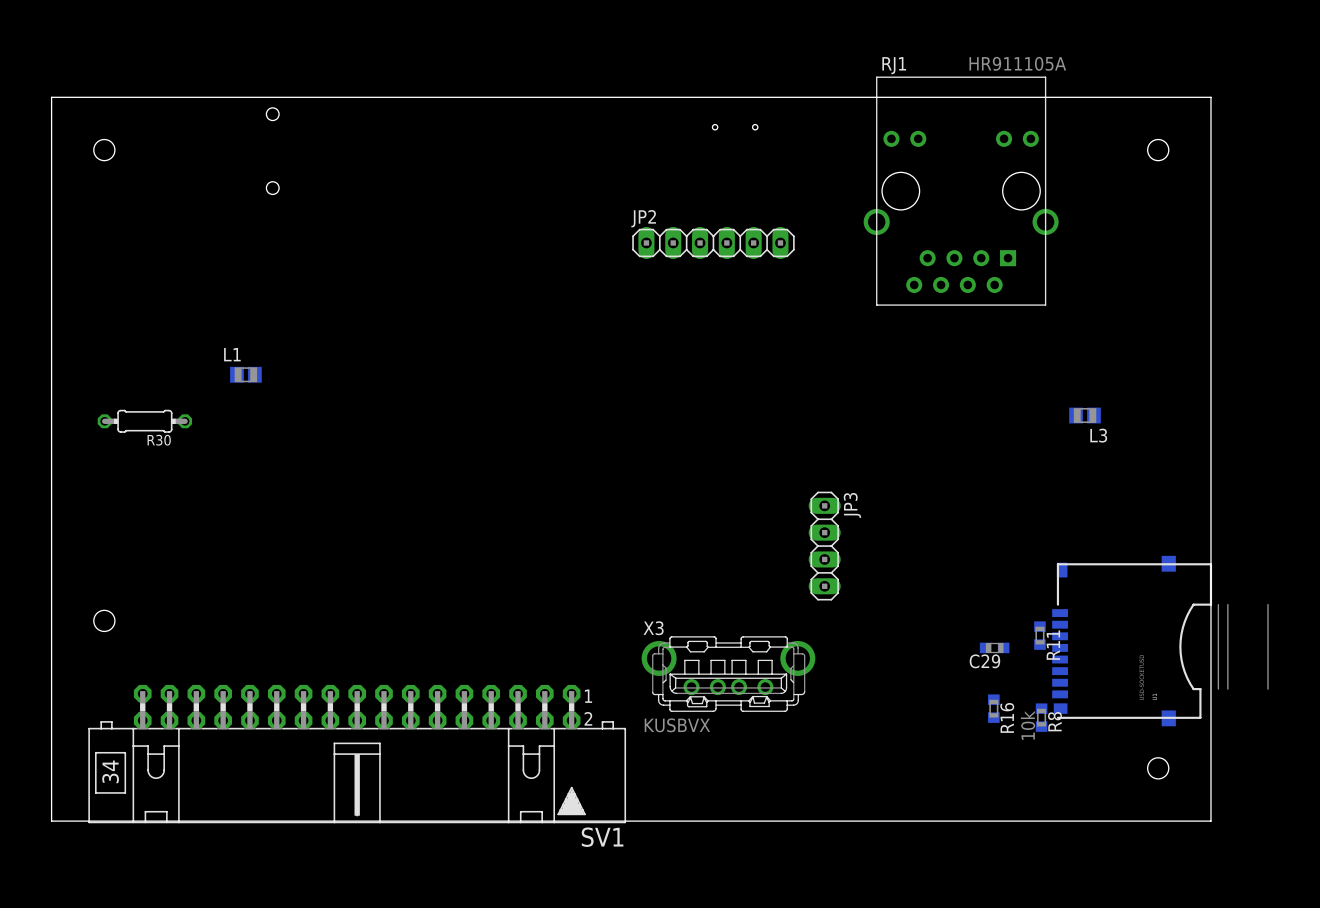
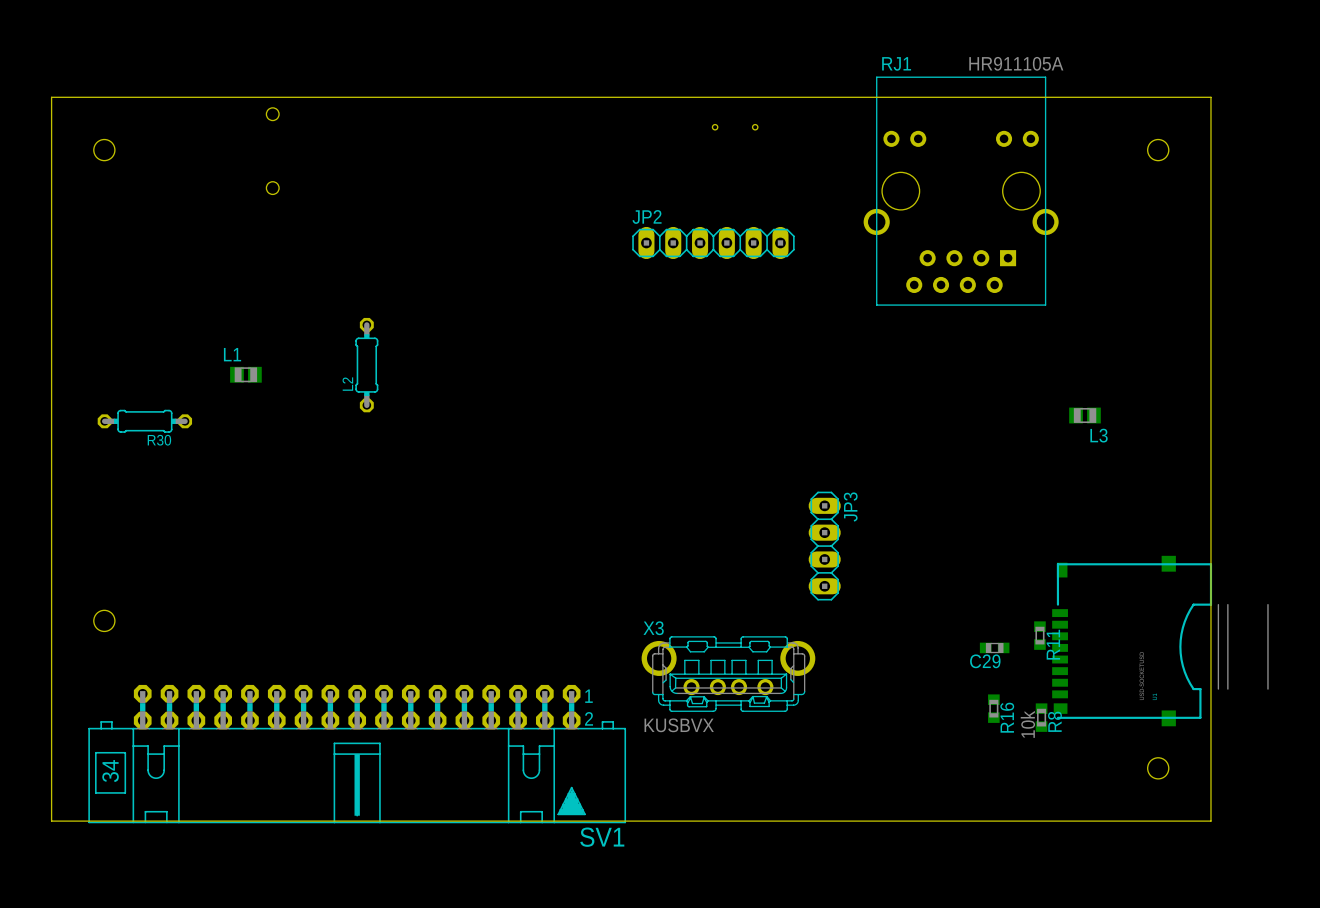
L2: none -> (366, 365)

